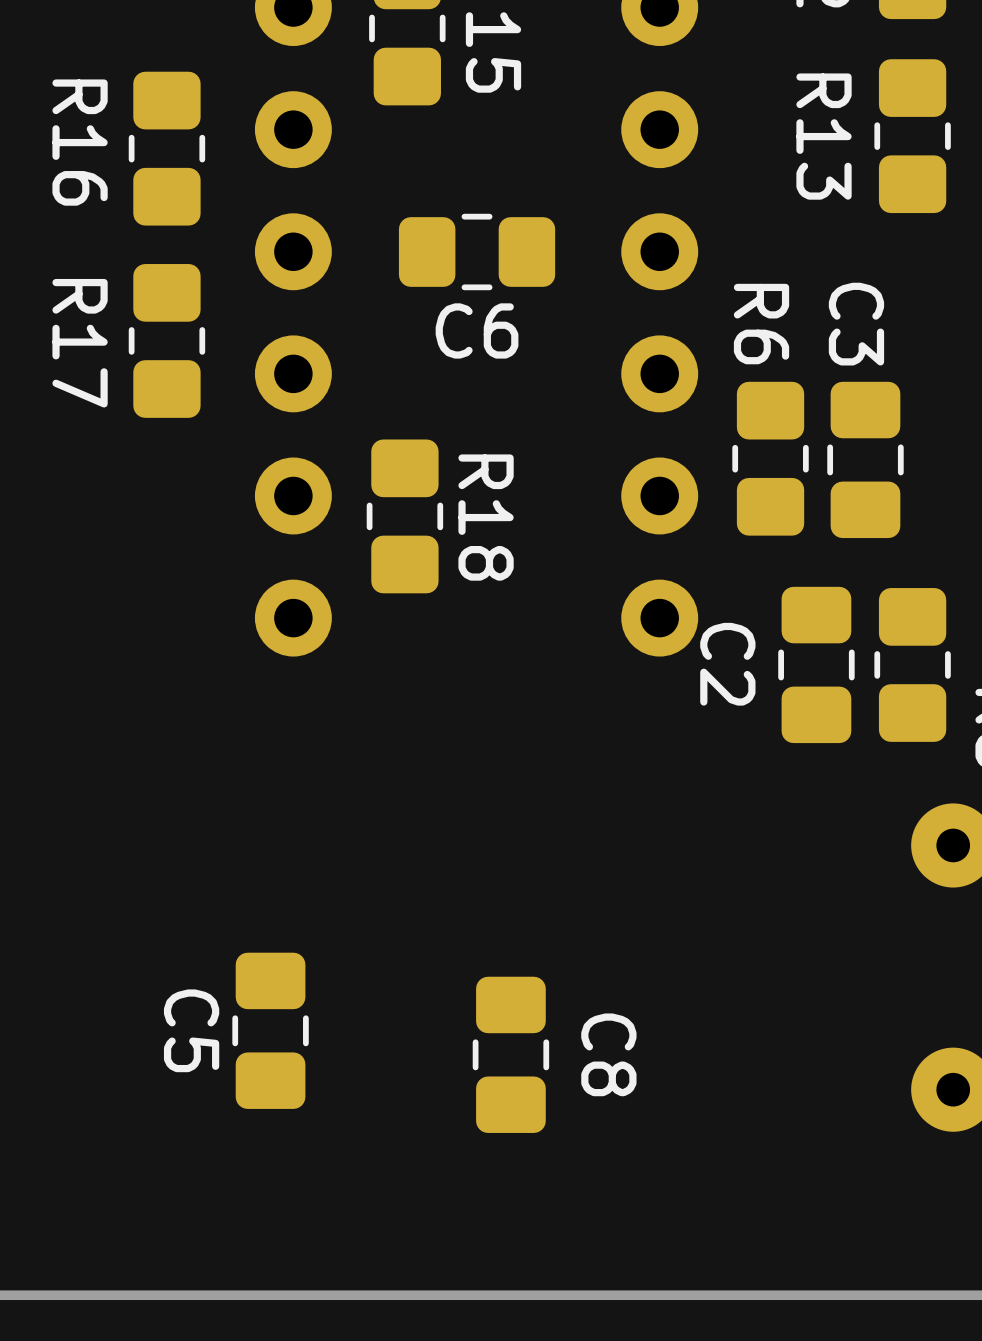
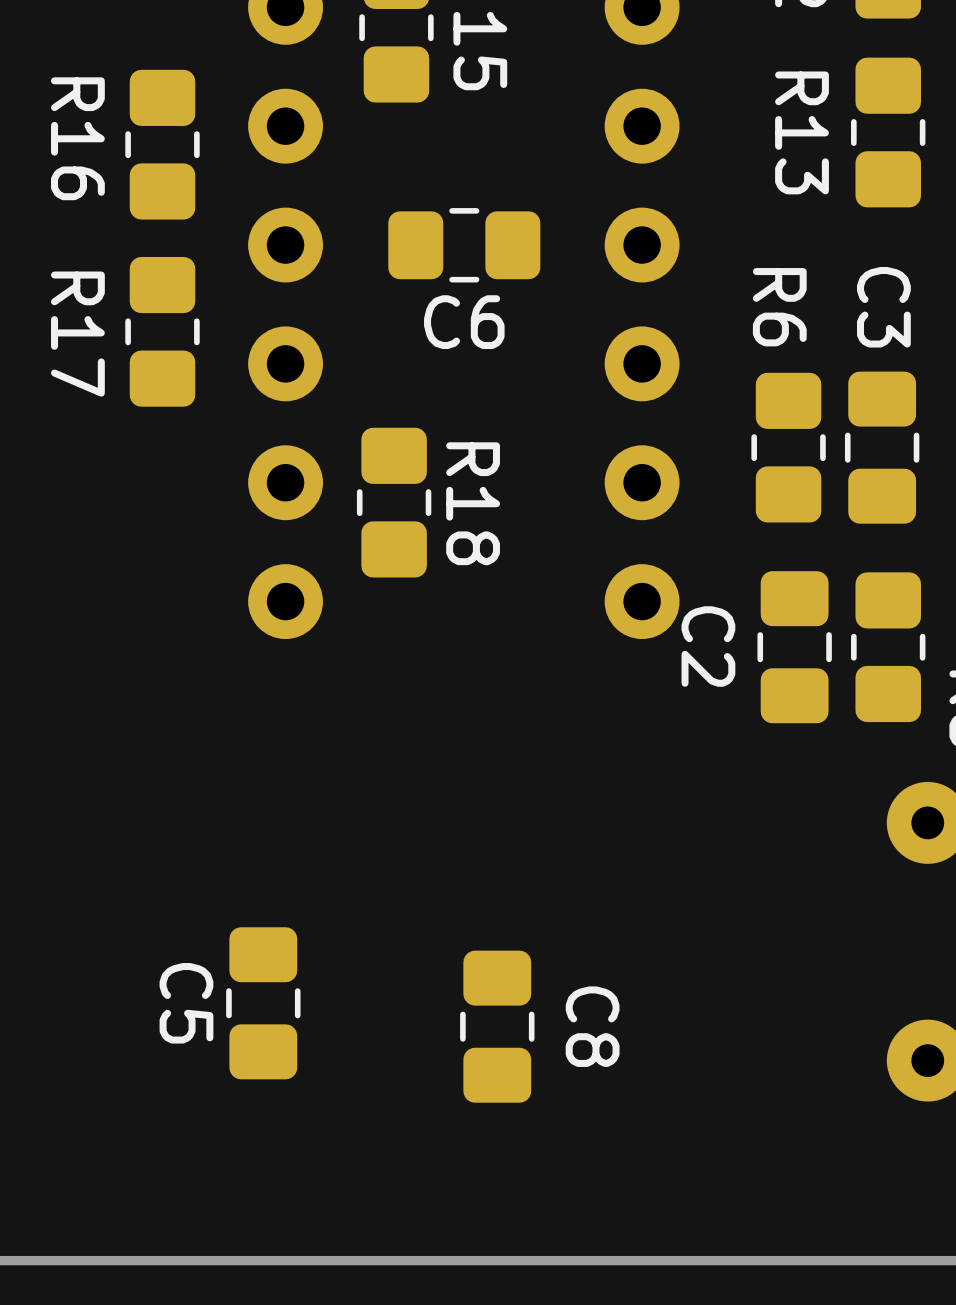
R6 name position: R6 (761, 324) -> R6 (779, 307)
C3 name position: C3 (856, 324) -> C3 (883, 307)
R6 position: (770, 458) -> (788, 447)
C3 position: (865, 459) -> (882, 447)

